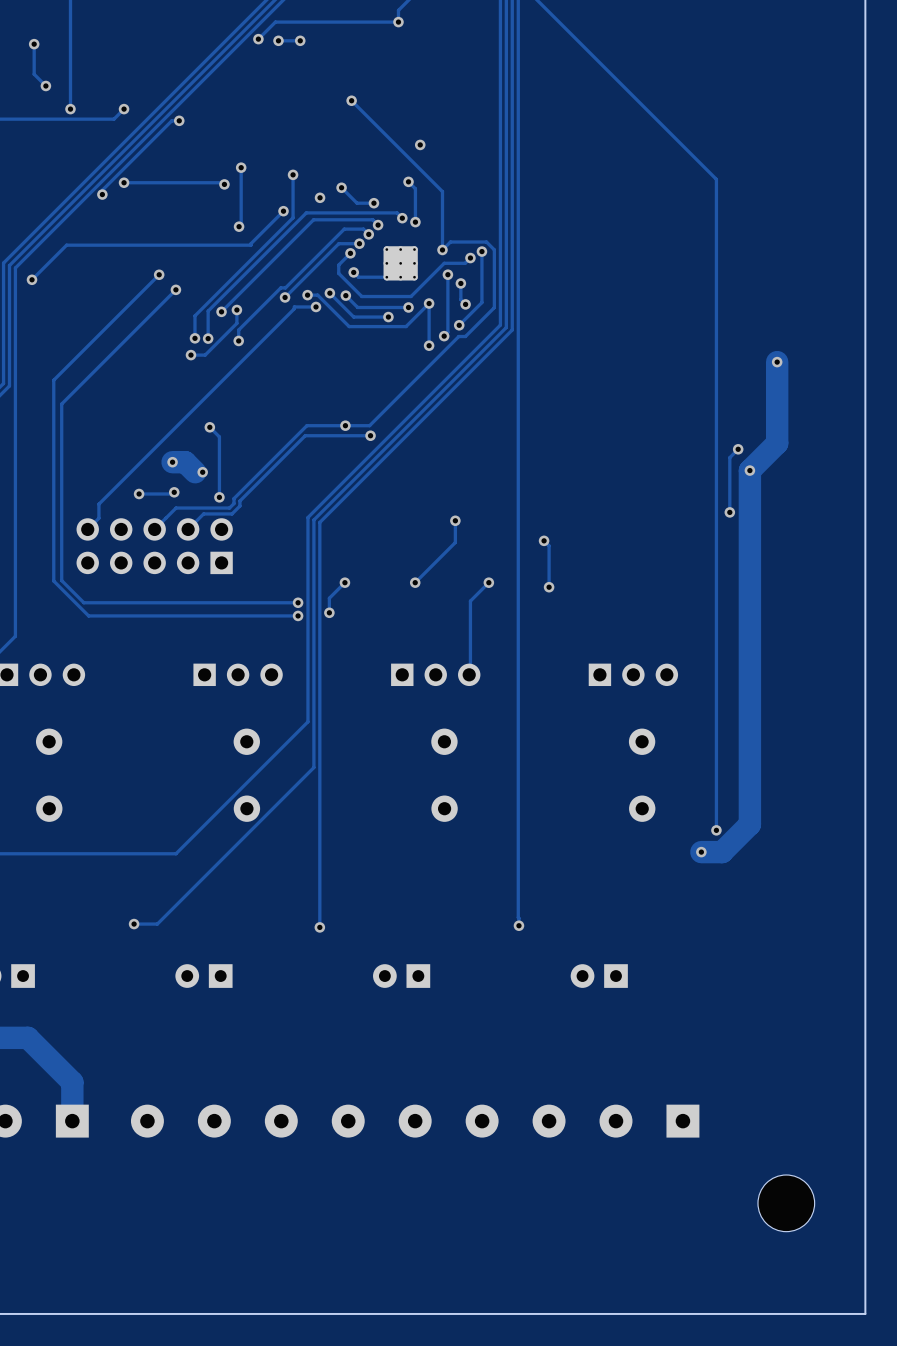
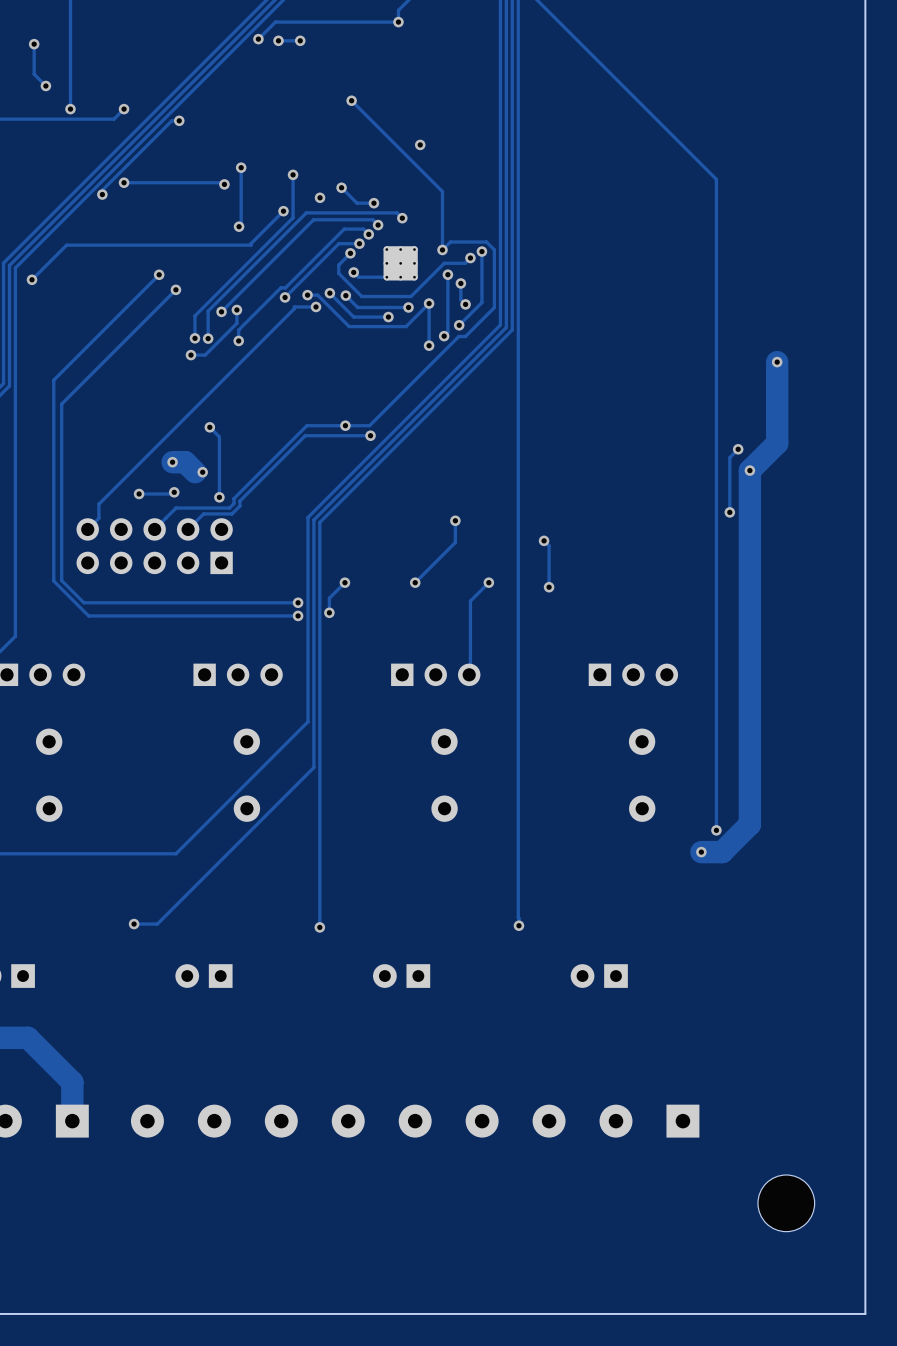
track: (408, 181) (415, 188) (415, 222) -> none
via: (408, 181) -> none
via: (415, 222) -> none

